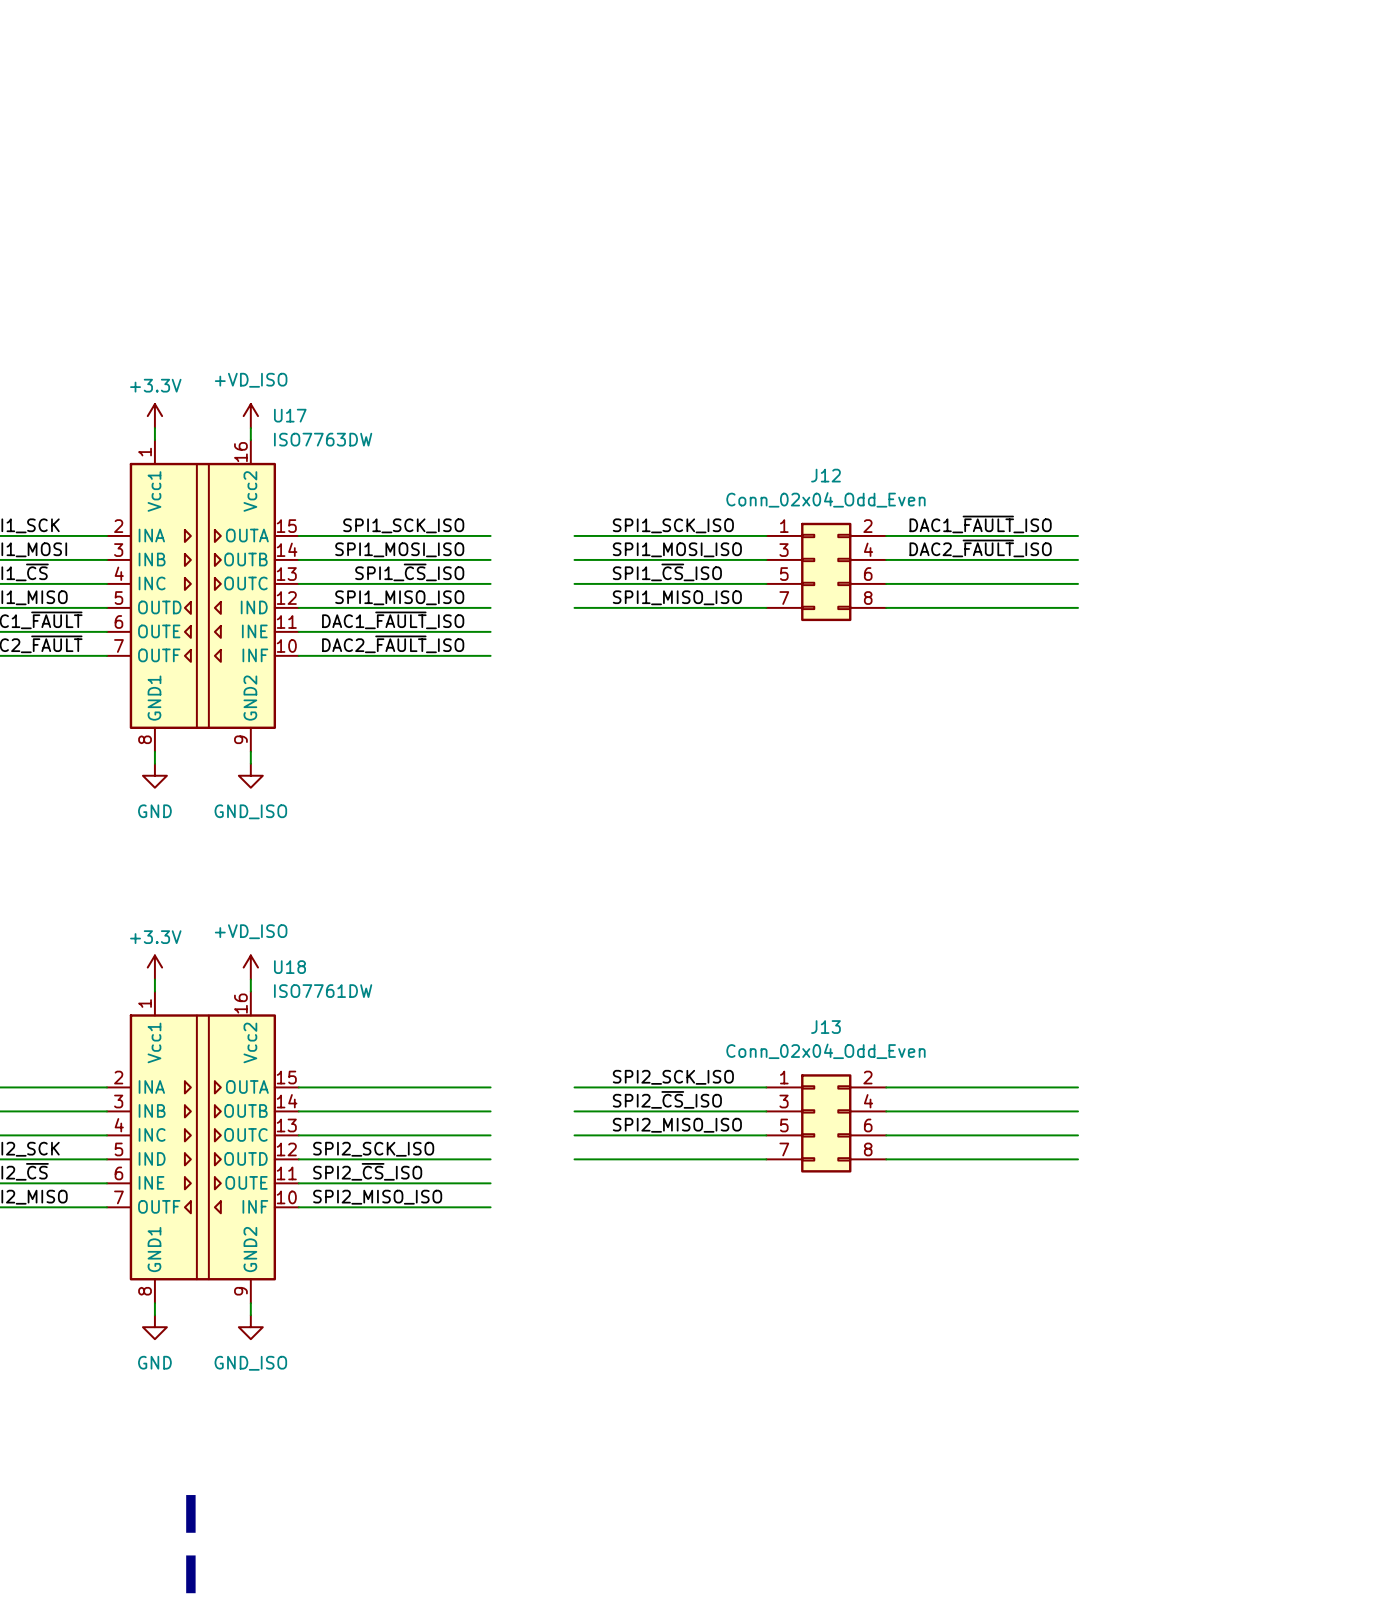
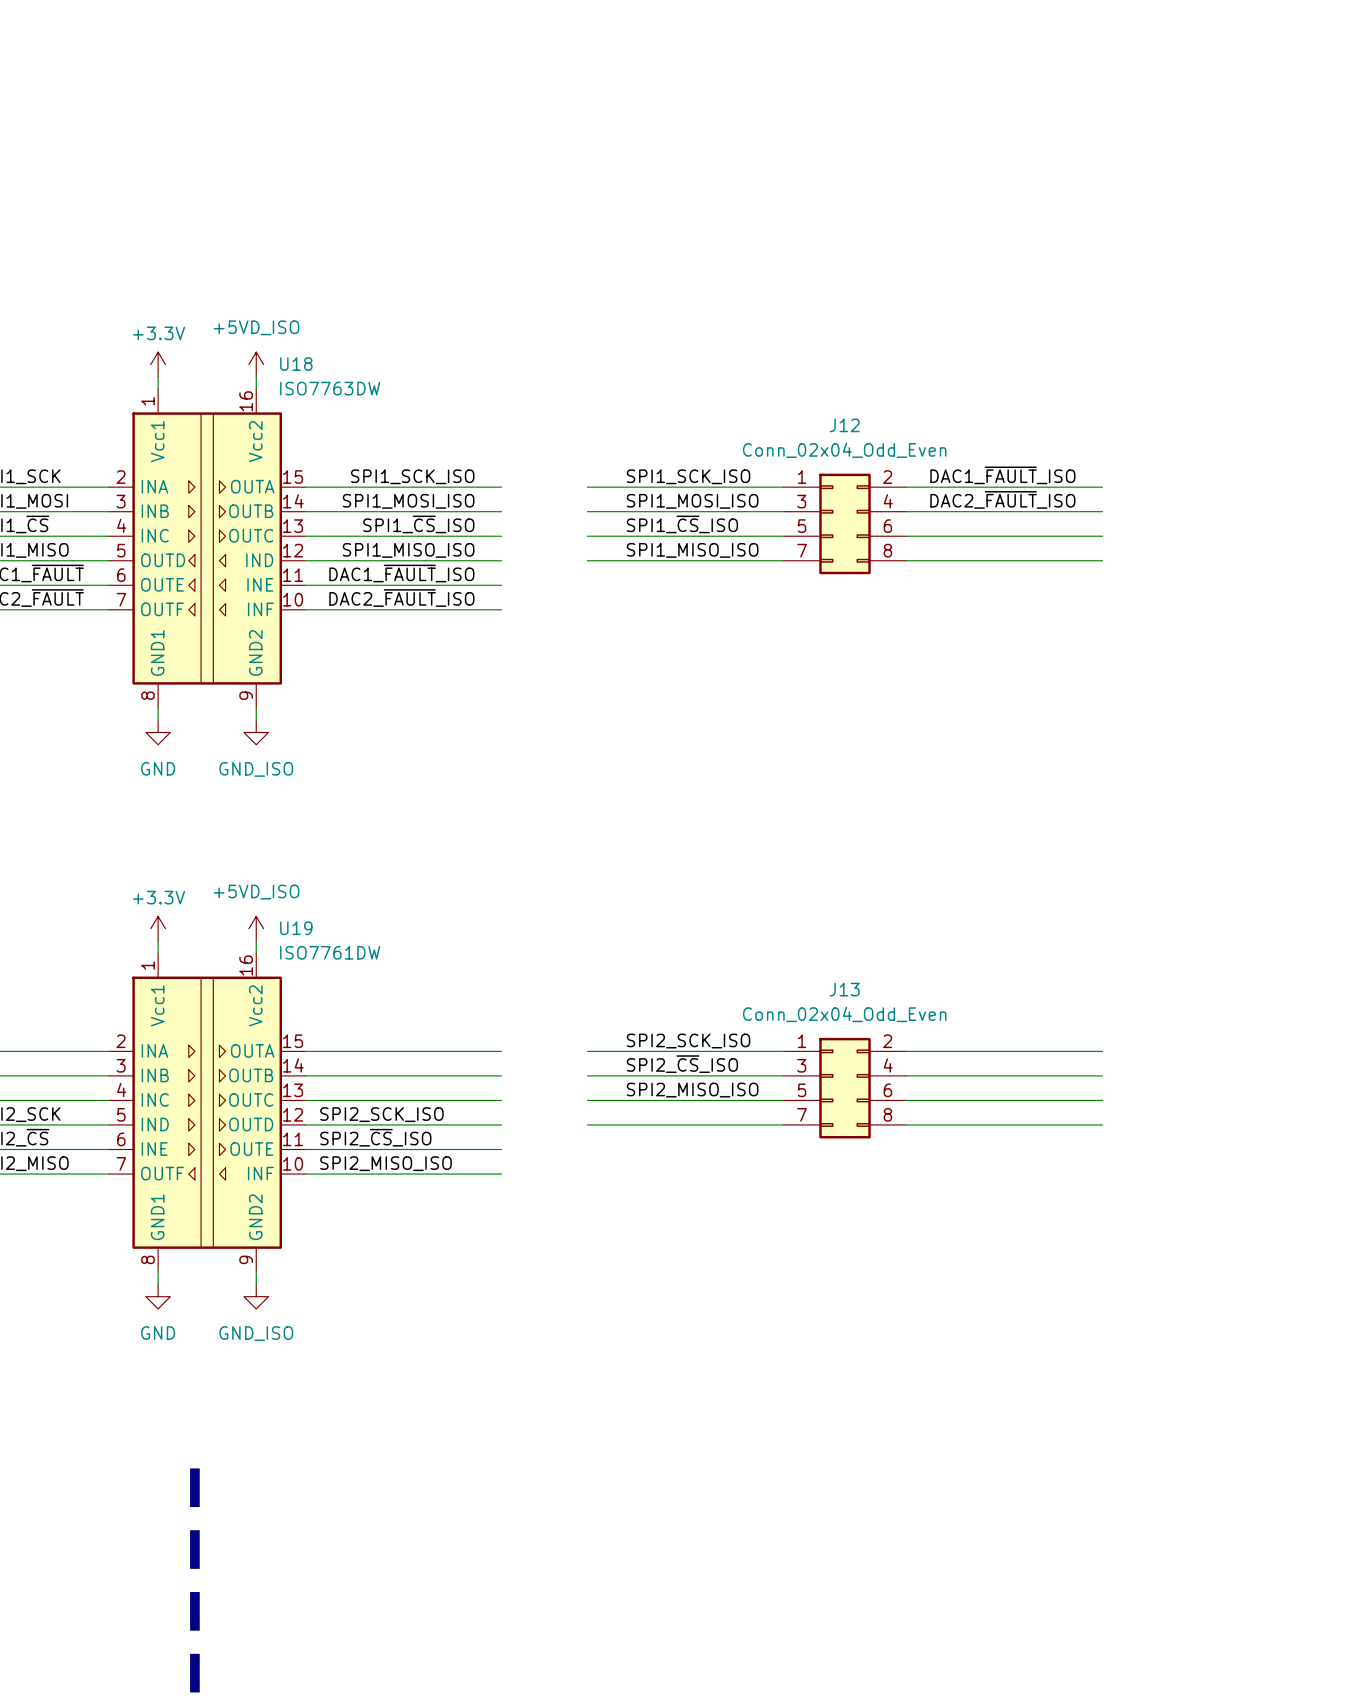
U17 name: U17 (290, 415) -> U18 (296, 364)
power symbol: +VD_ISO (250, 416) -> +5VD_ISO (256, 364)
power symbol: +VD_ISO (250, 967) -> +5VD_ISO (256, 928)
U18 name: U18 (289, 967) -> U19 (296, 928)

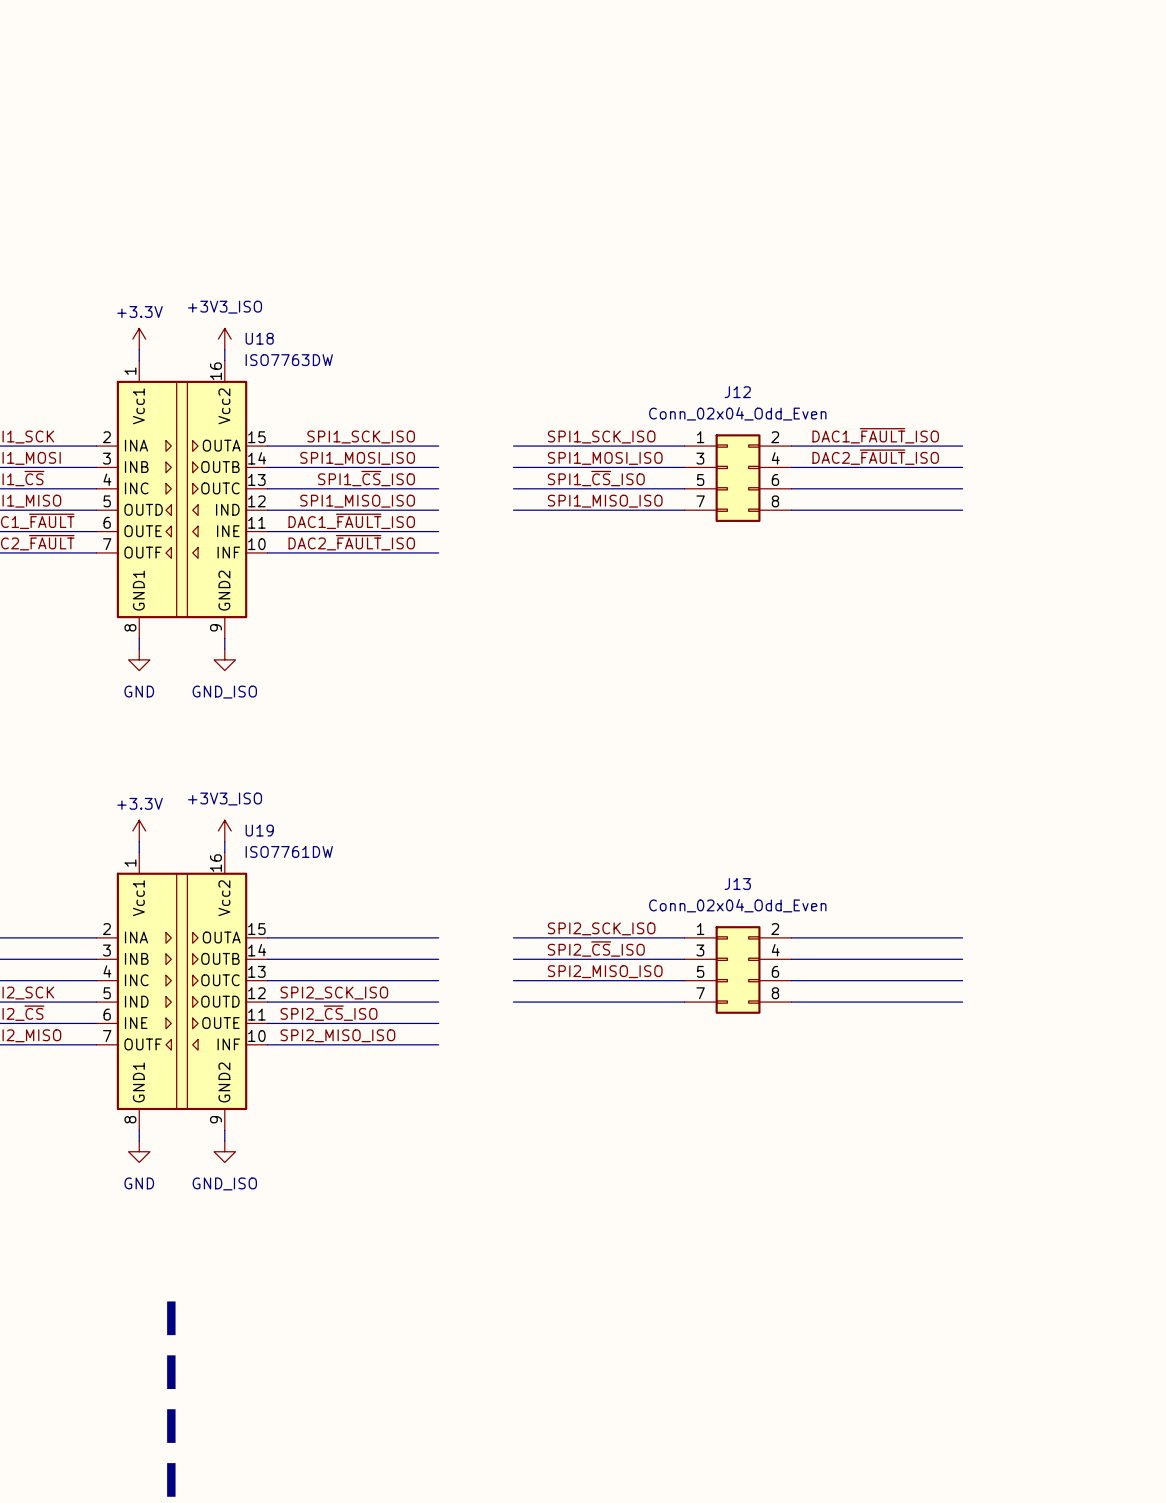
power symbol: +5VD_ISO (256, 364) -> +3V3_ISO (224, 339)
power symbol: +5VD_ISO (256, 928) -> +3V3_ISO (224, 830)

